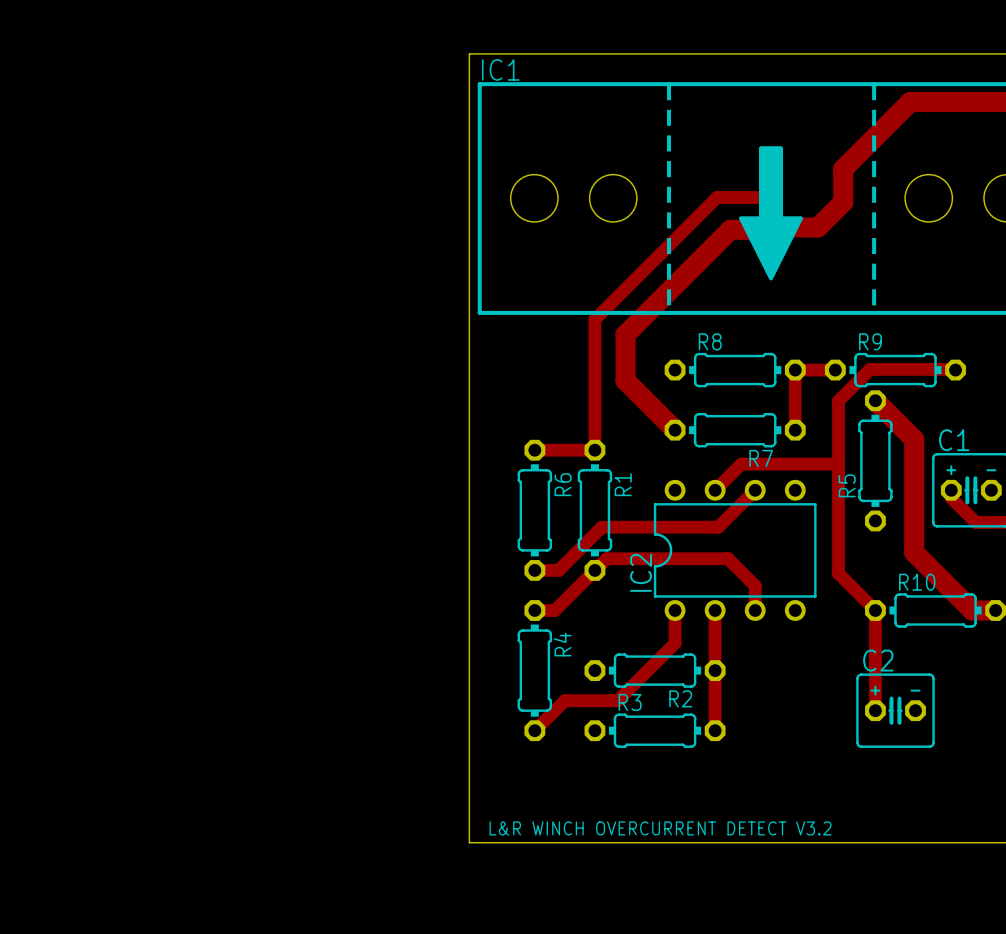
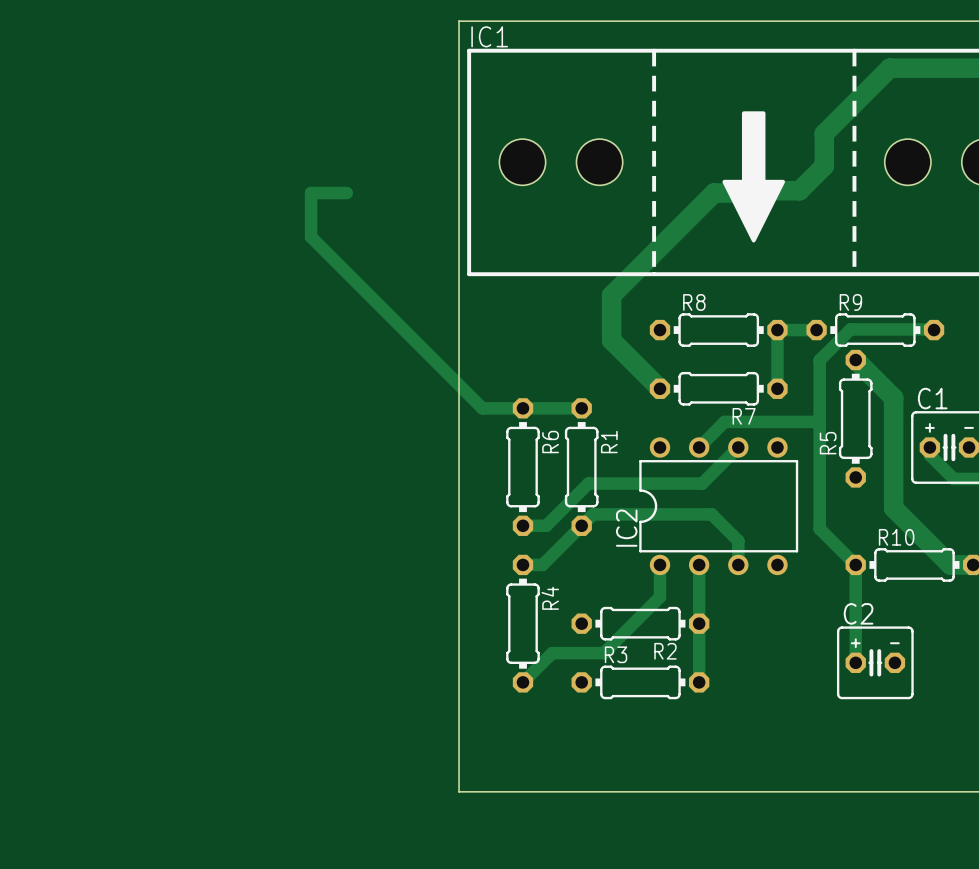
track: (771, 198) (717, 197) (594, 319) (594, 450) -> none
track: none -> (346, 193) (311, 193) (311, 236) (482, 408) (522, 408)
text: L&R WINCH OVERCURRENT DETECT V3.2 (660, 828) -> none

